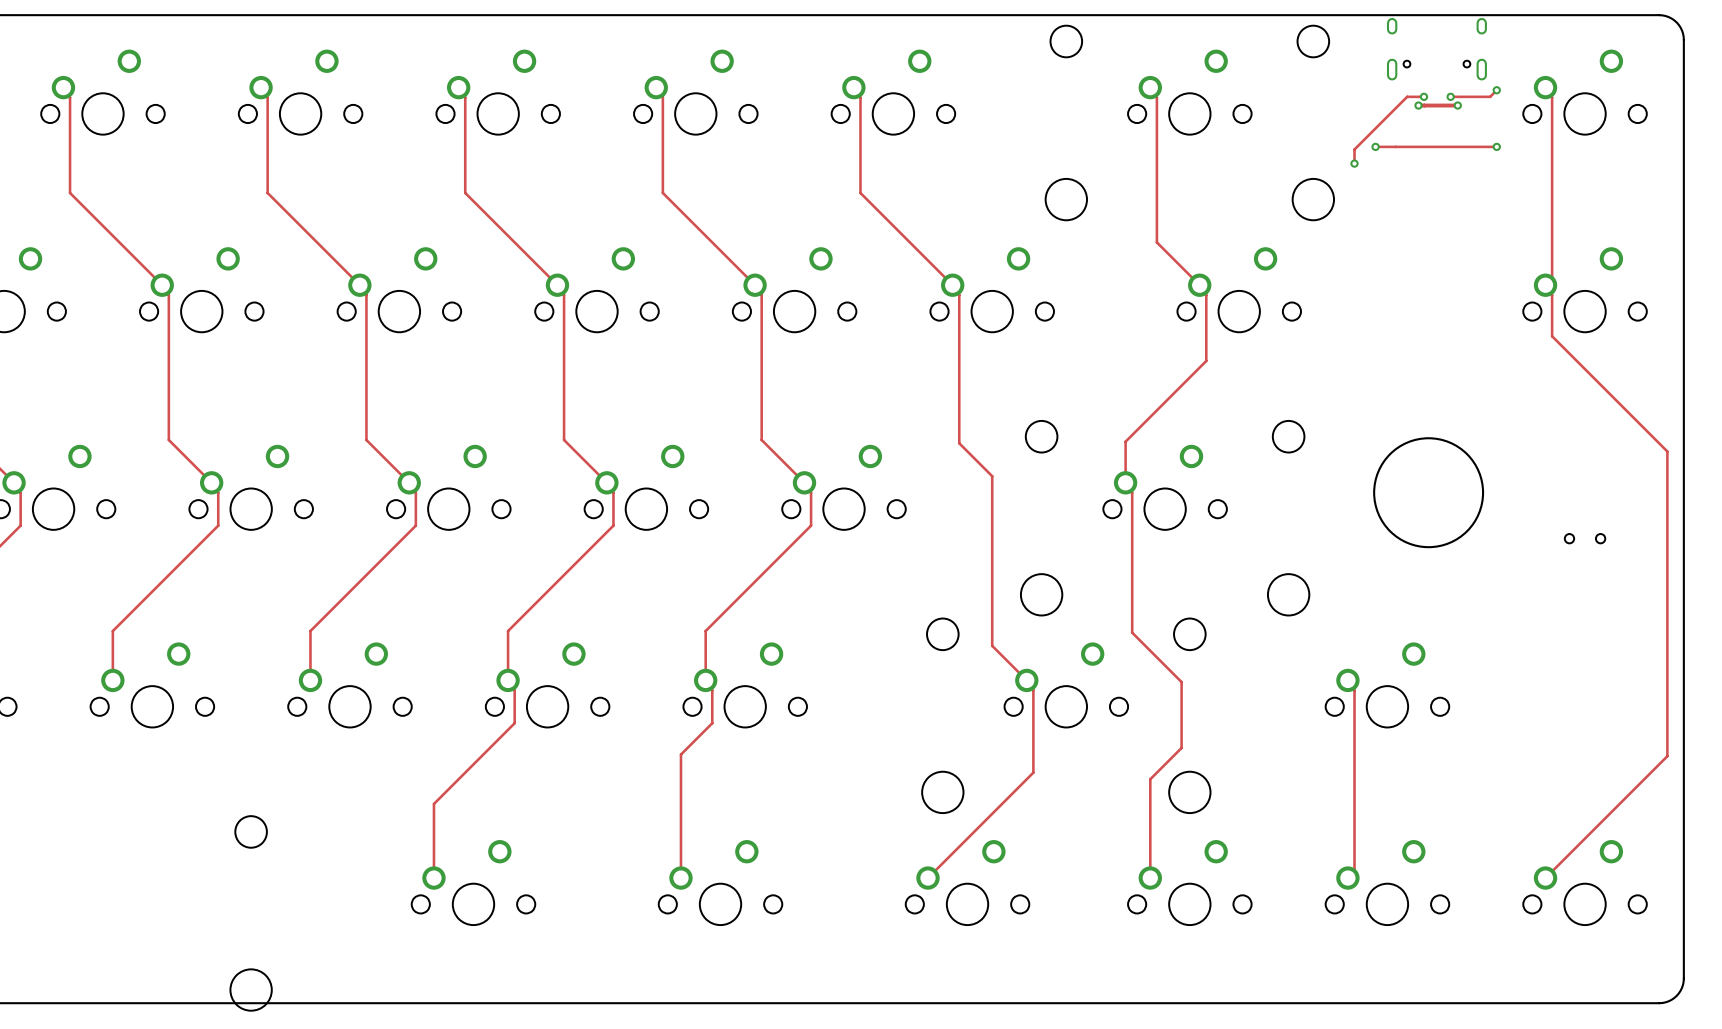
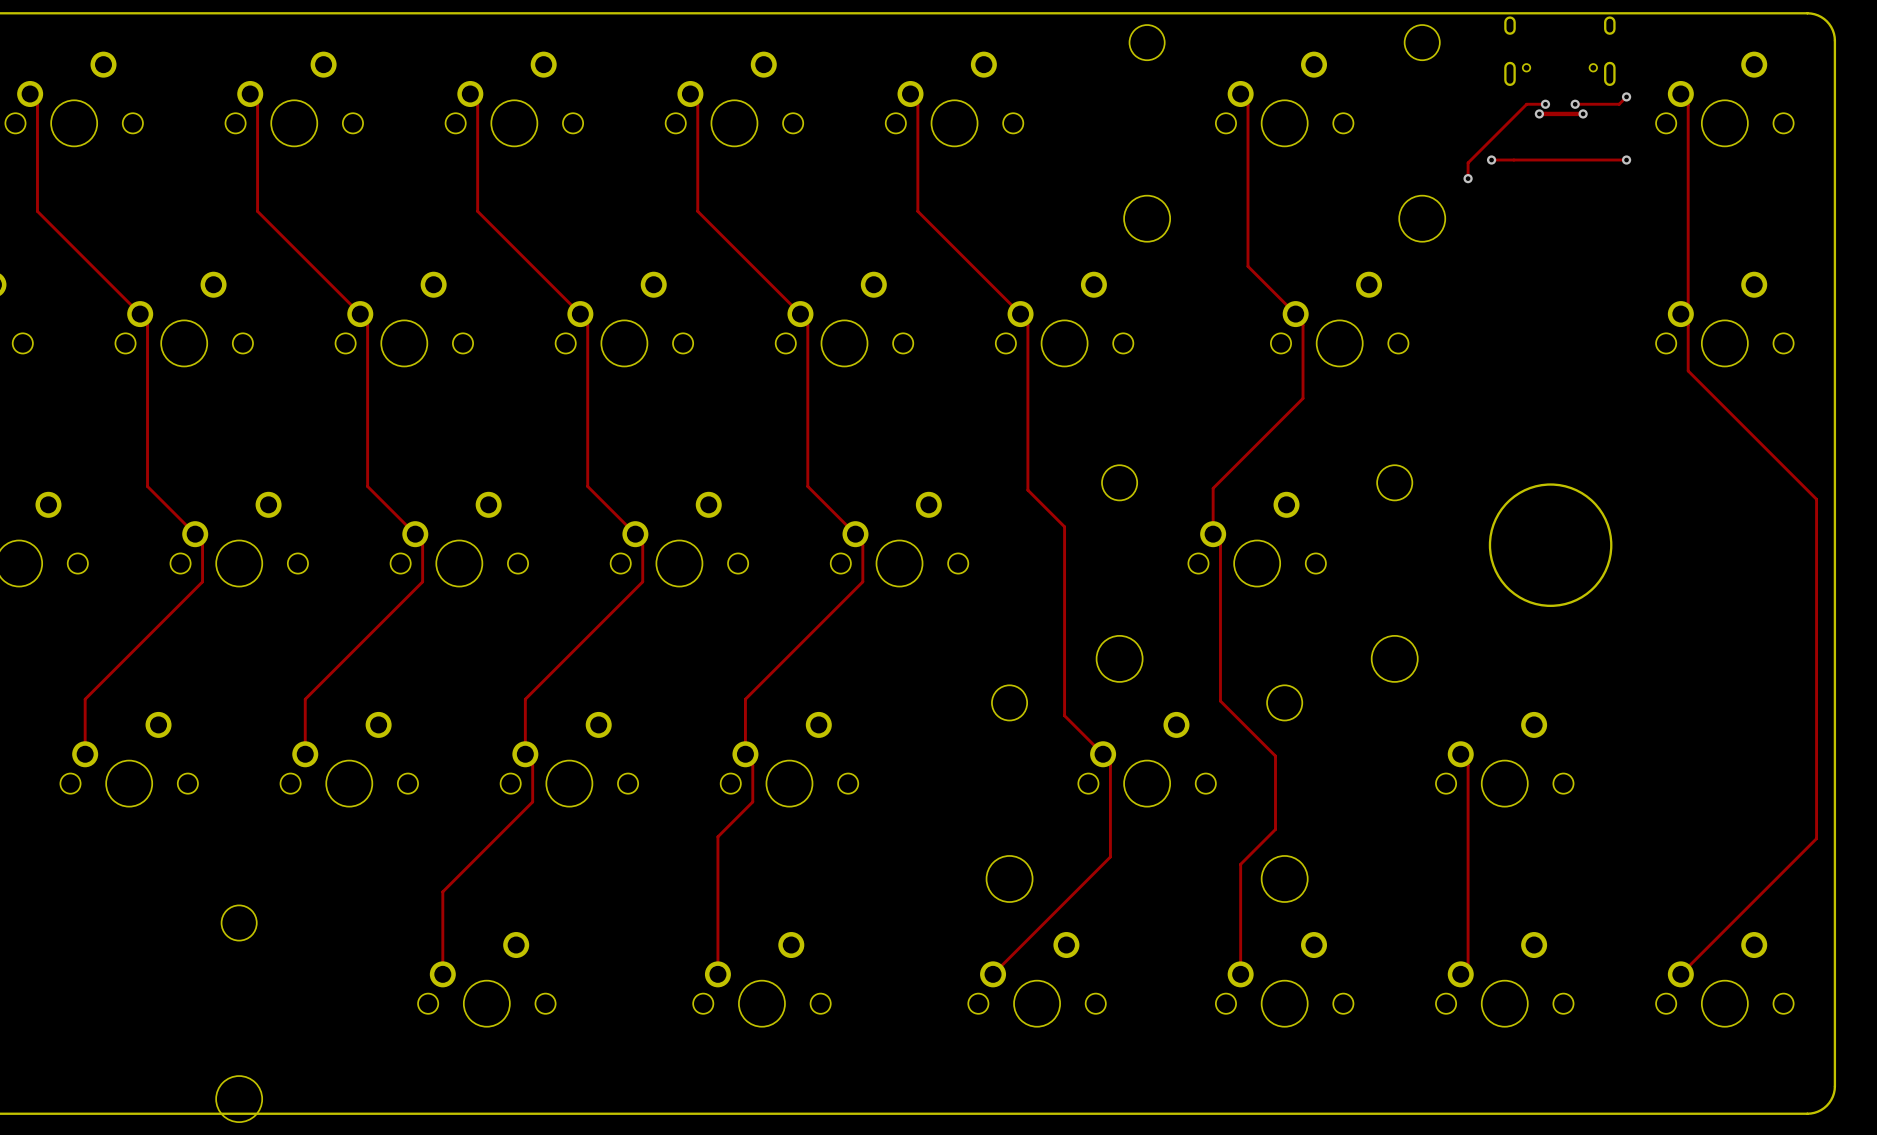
part: (1585, 538) -> none

